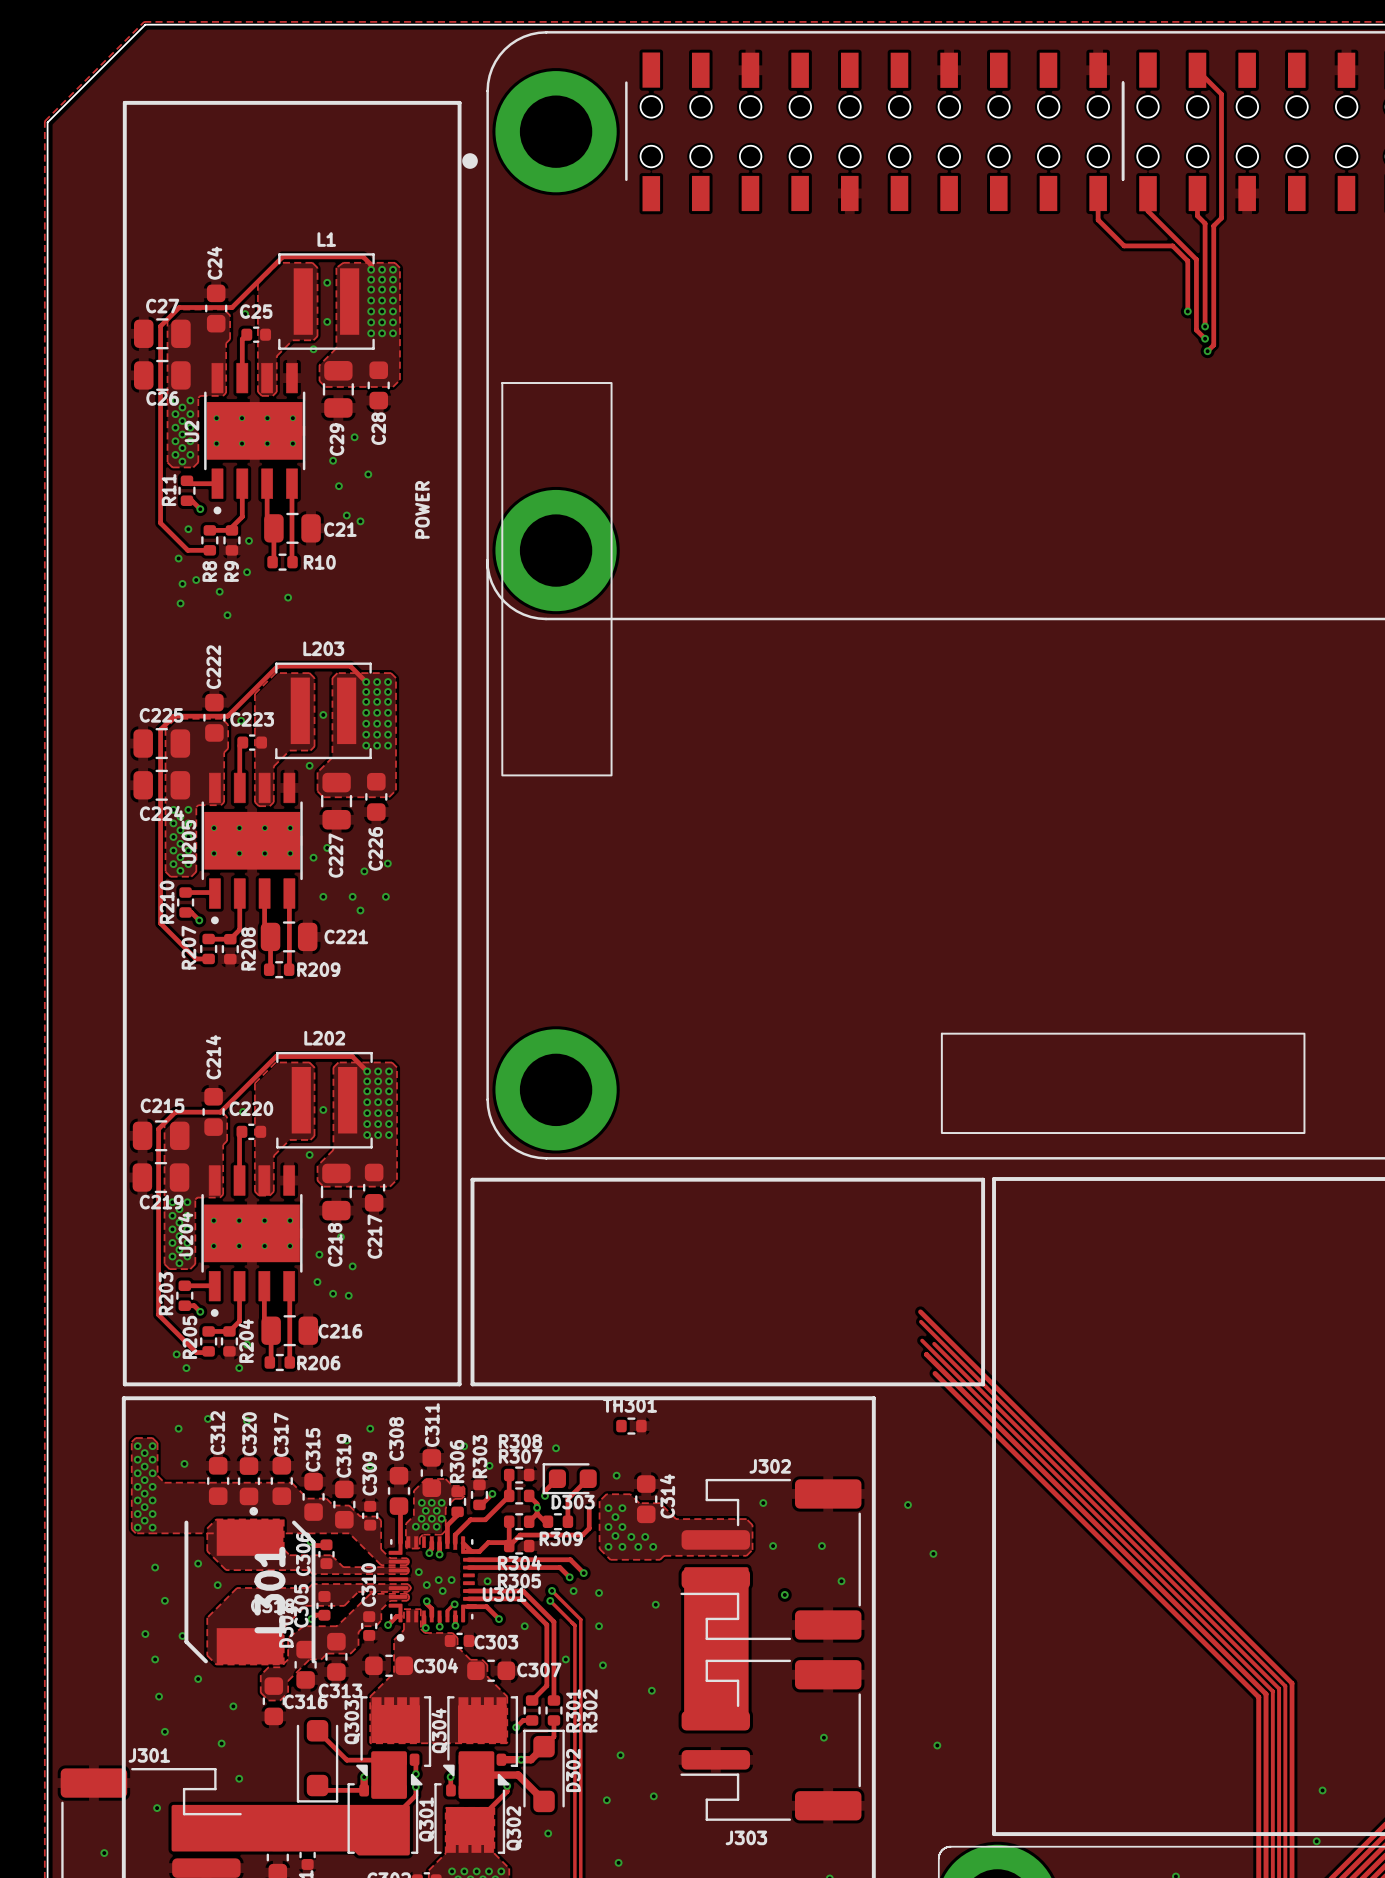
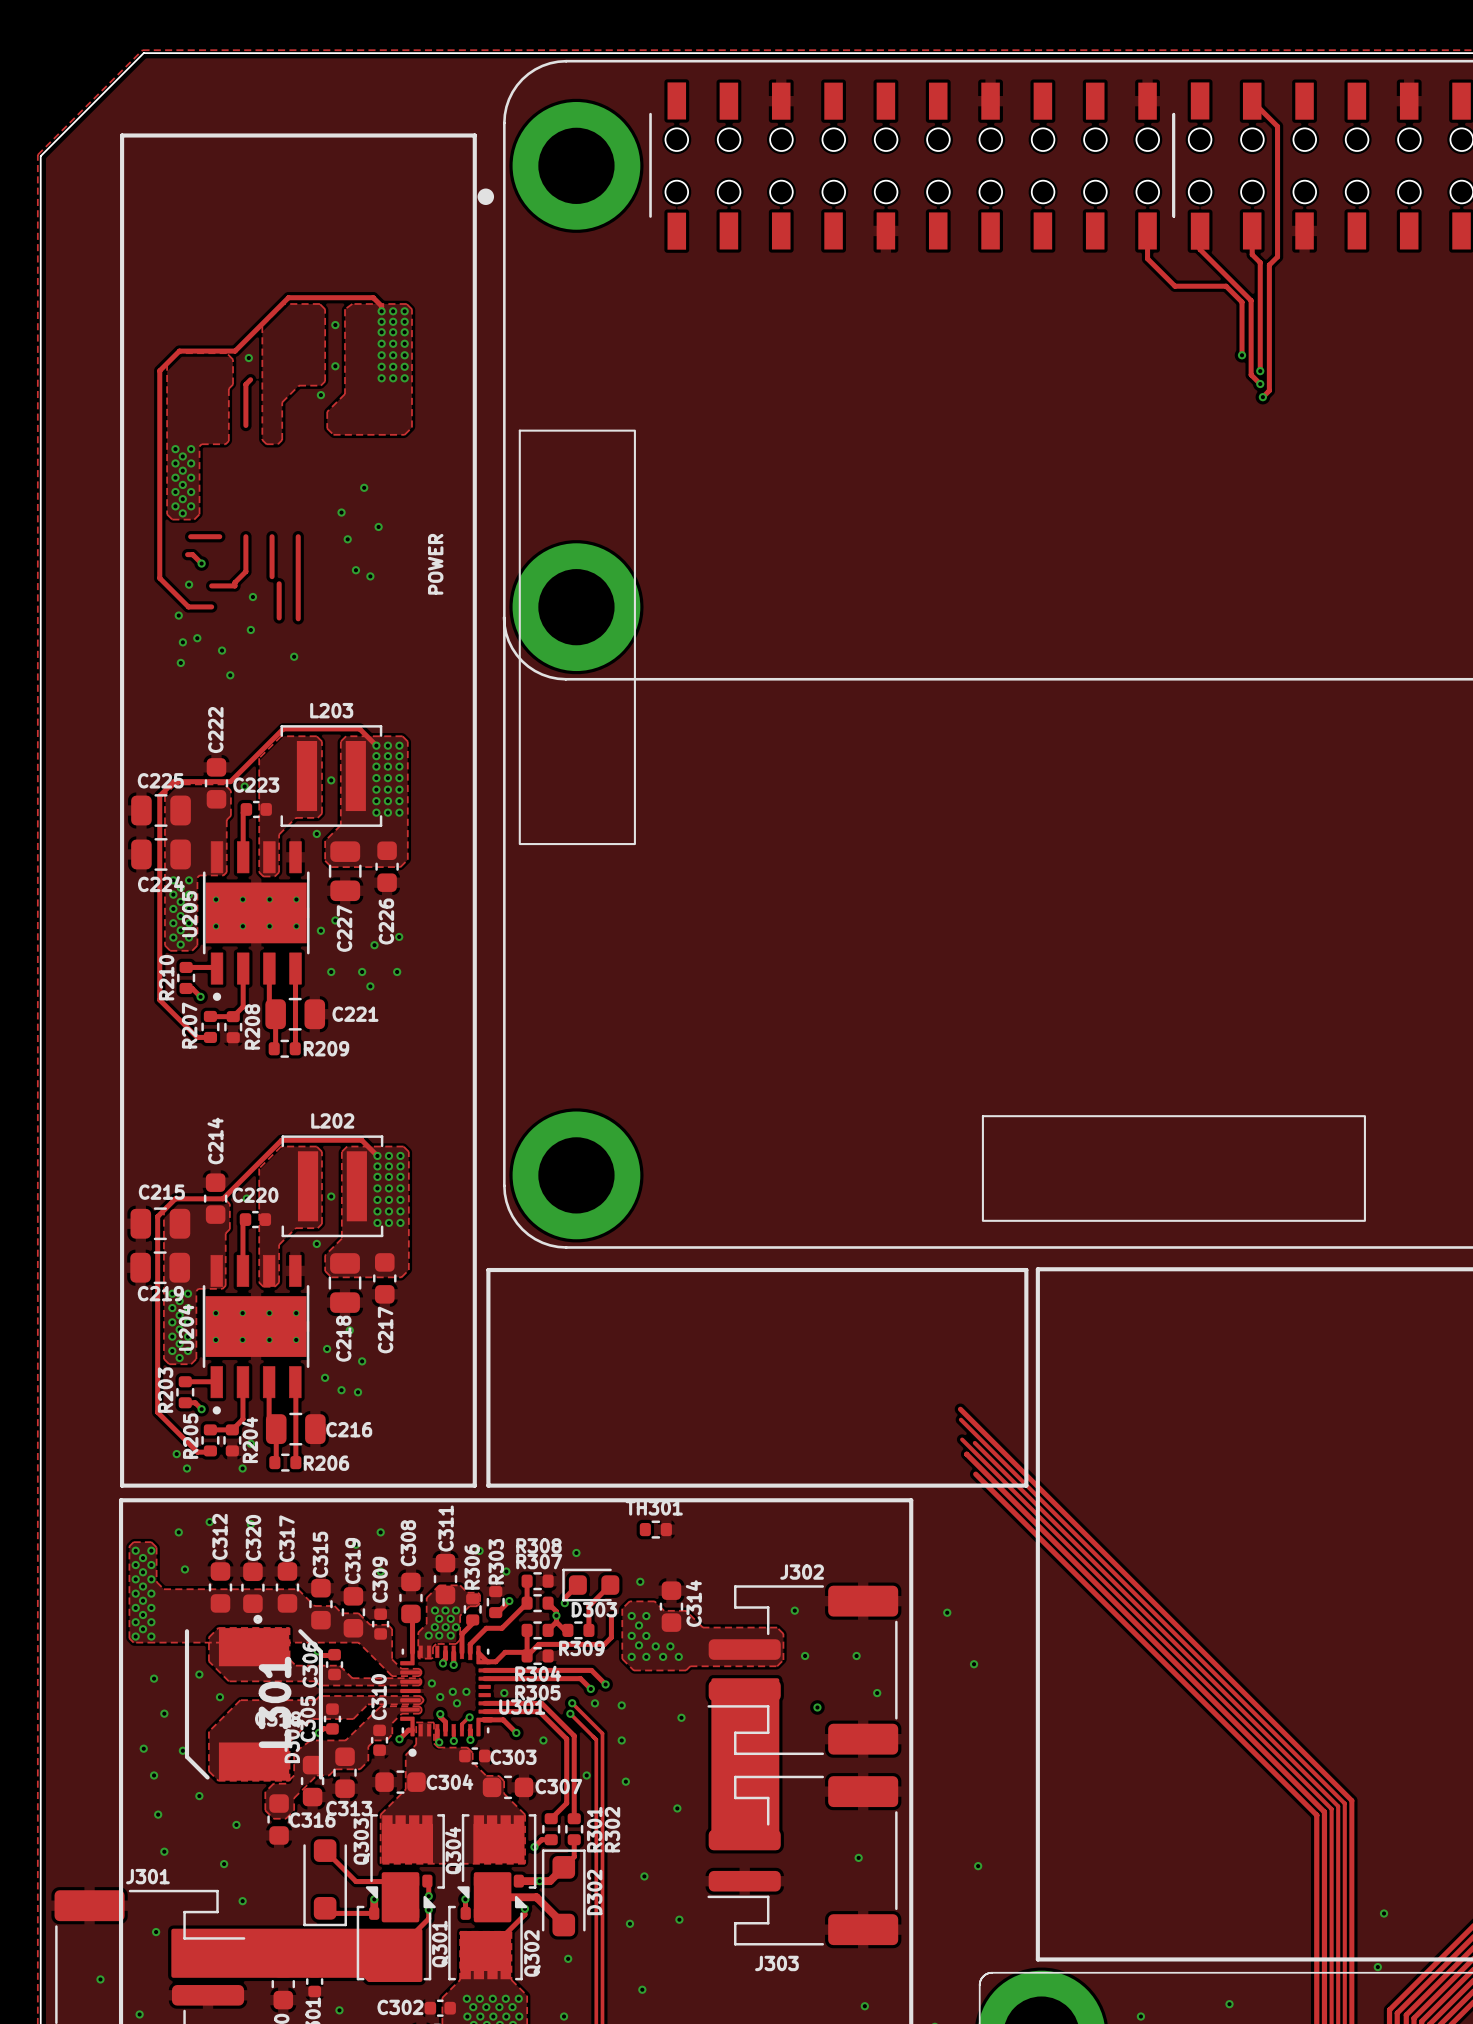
L1: (326, 301) -> none
C24: (216, 308) -> none
C27: (162, 333) -> none
C25: (256, 334) -> none
C26: (162, 375) -> none
C28: (378, 385) -> none
C29: (338, 389) -> none
U2: (254, 438) -> none
R11: (186, 490) -> none
C21: (292, 528) -> none
R8: (209, 540) -> none
R9: (231, 540) -> none
R10: (282, 562) -> none

